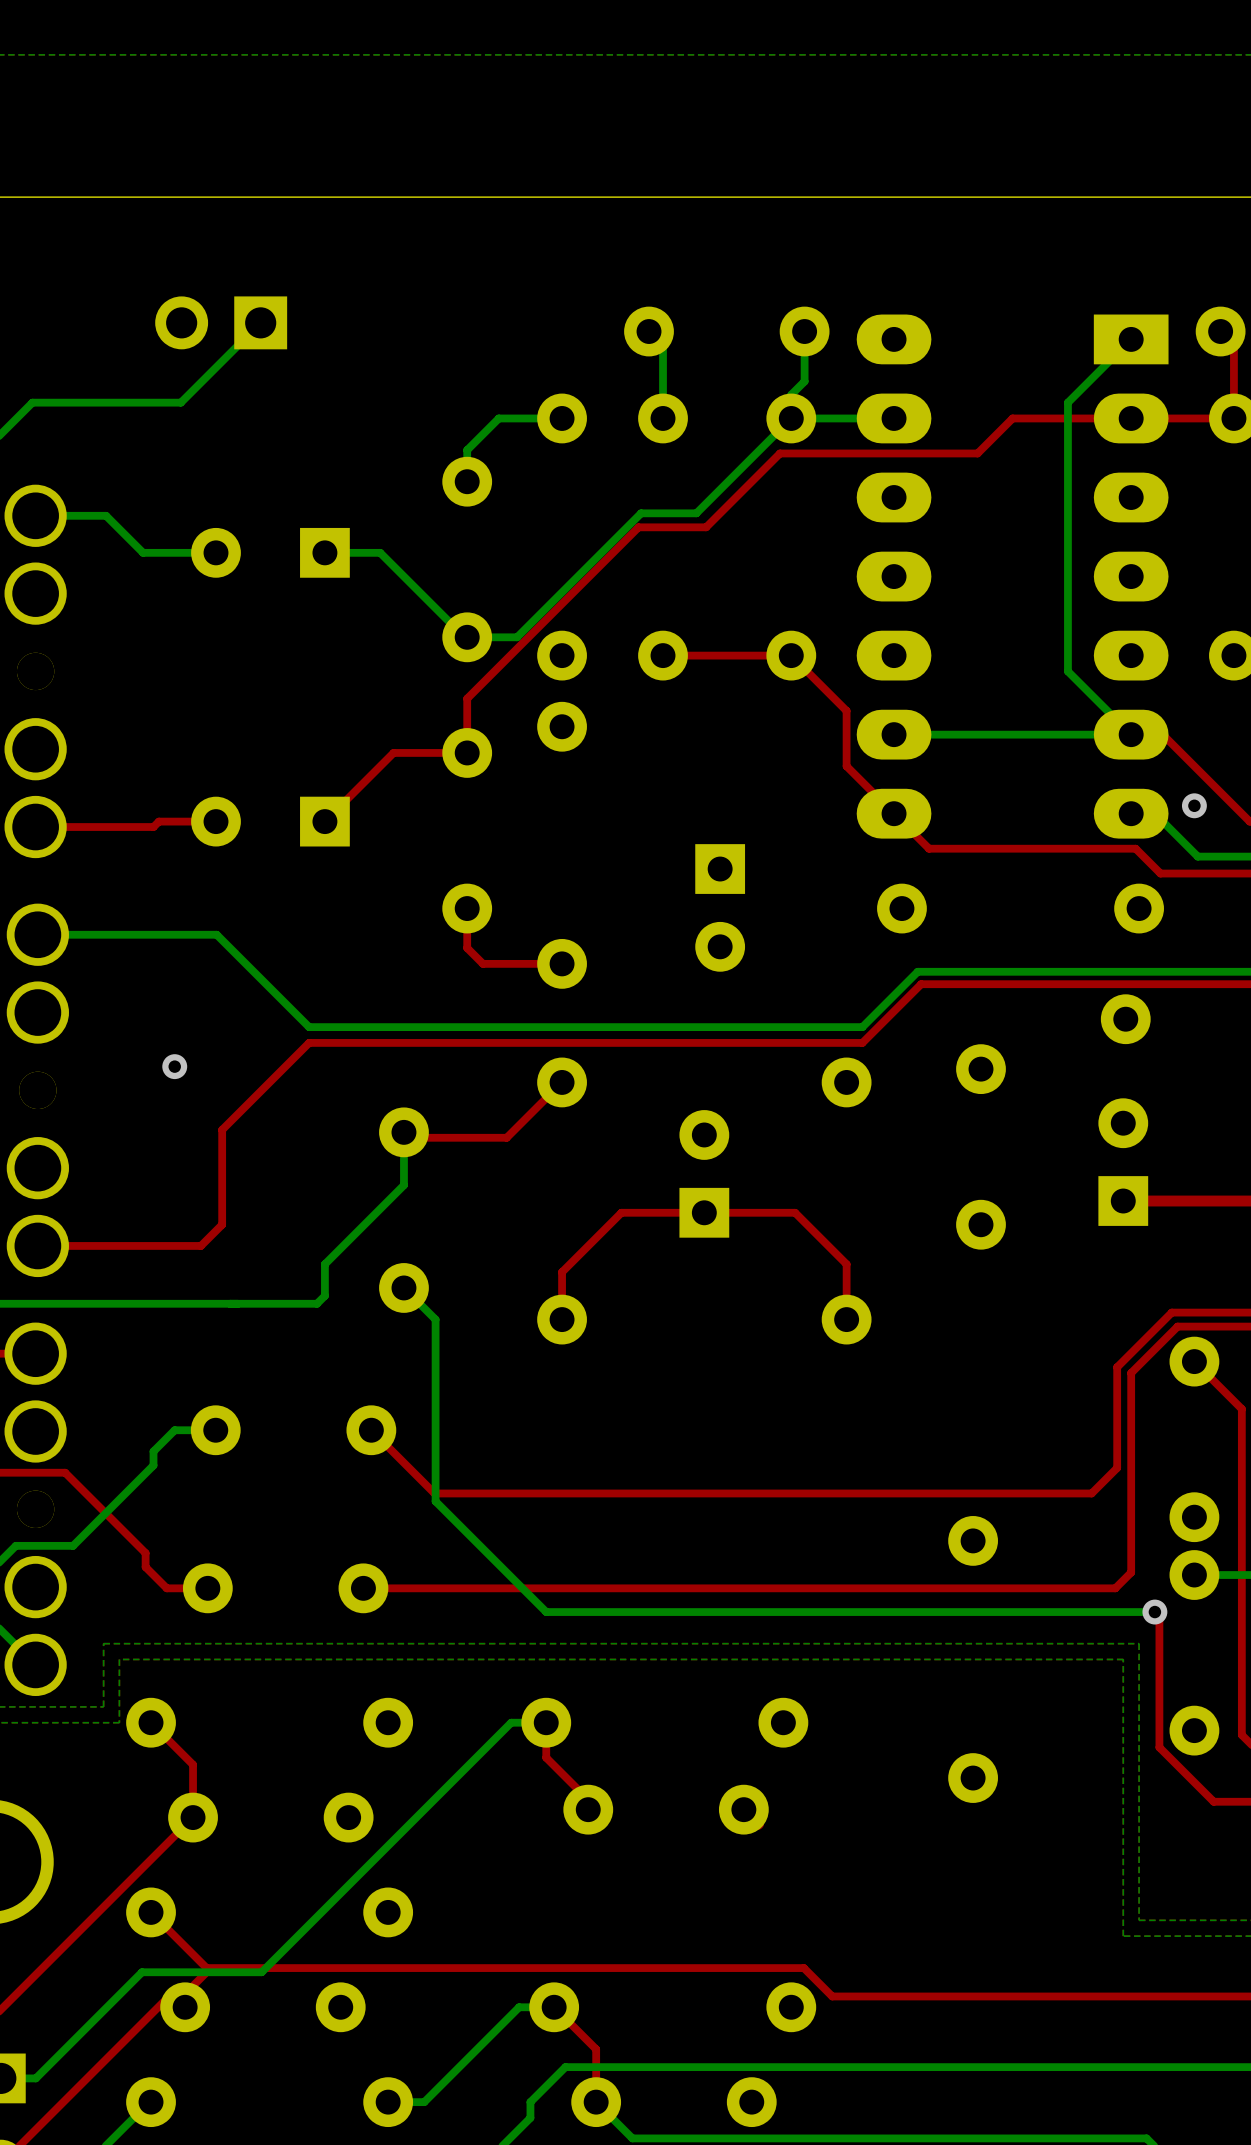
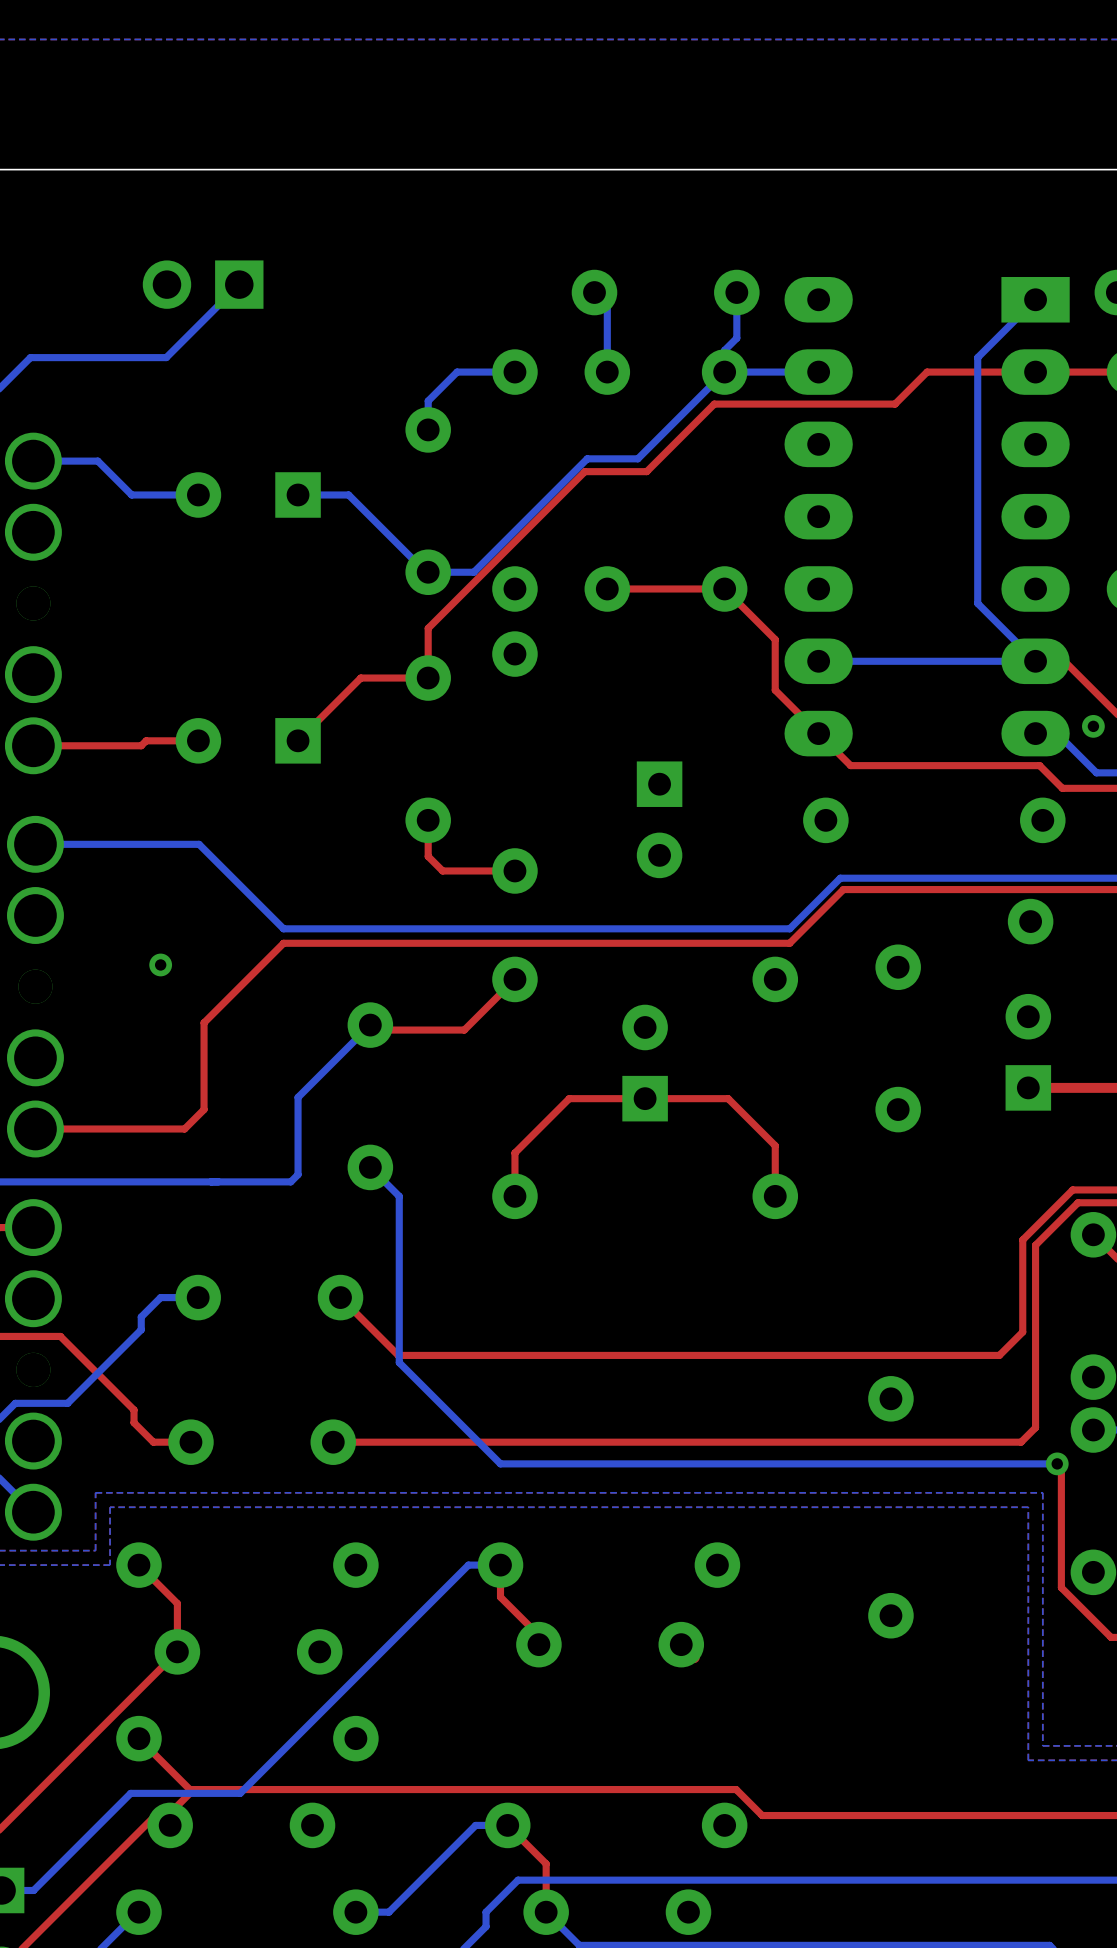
bottom track: (403, 1132) (403, 1185) (324, 1264) -> (370, 1025) (298, 1097) (298, 1145)

